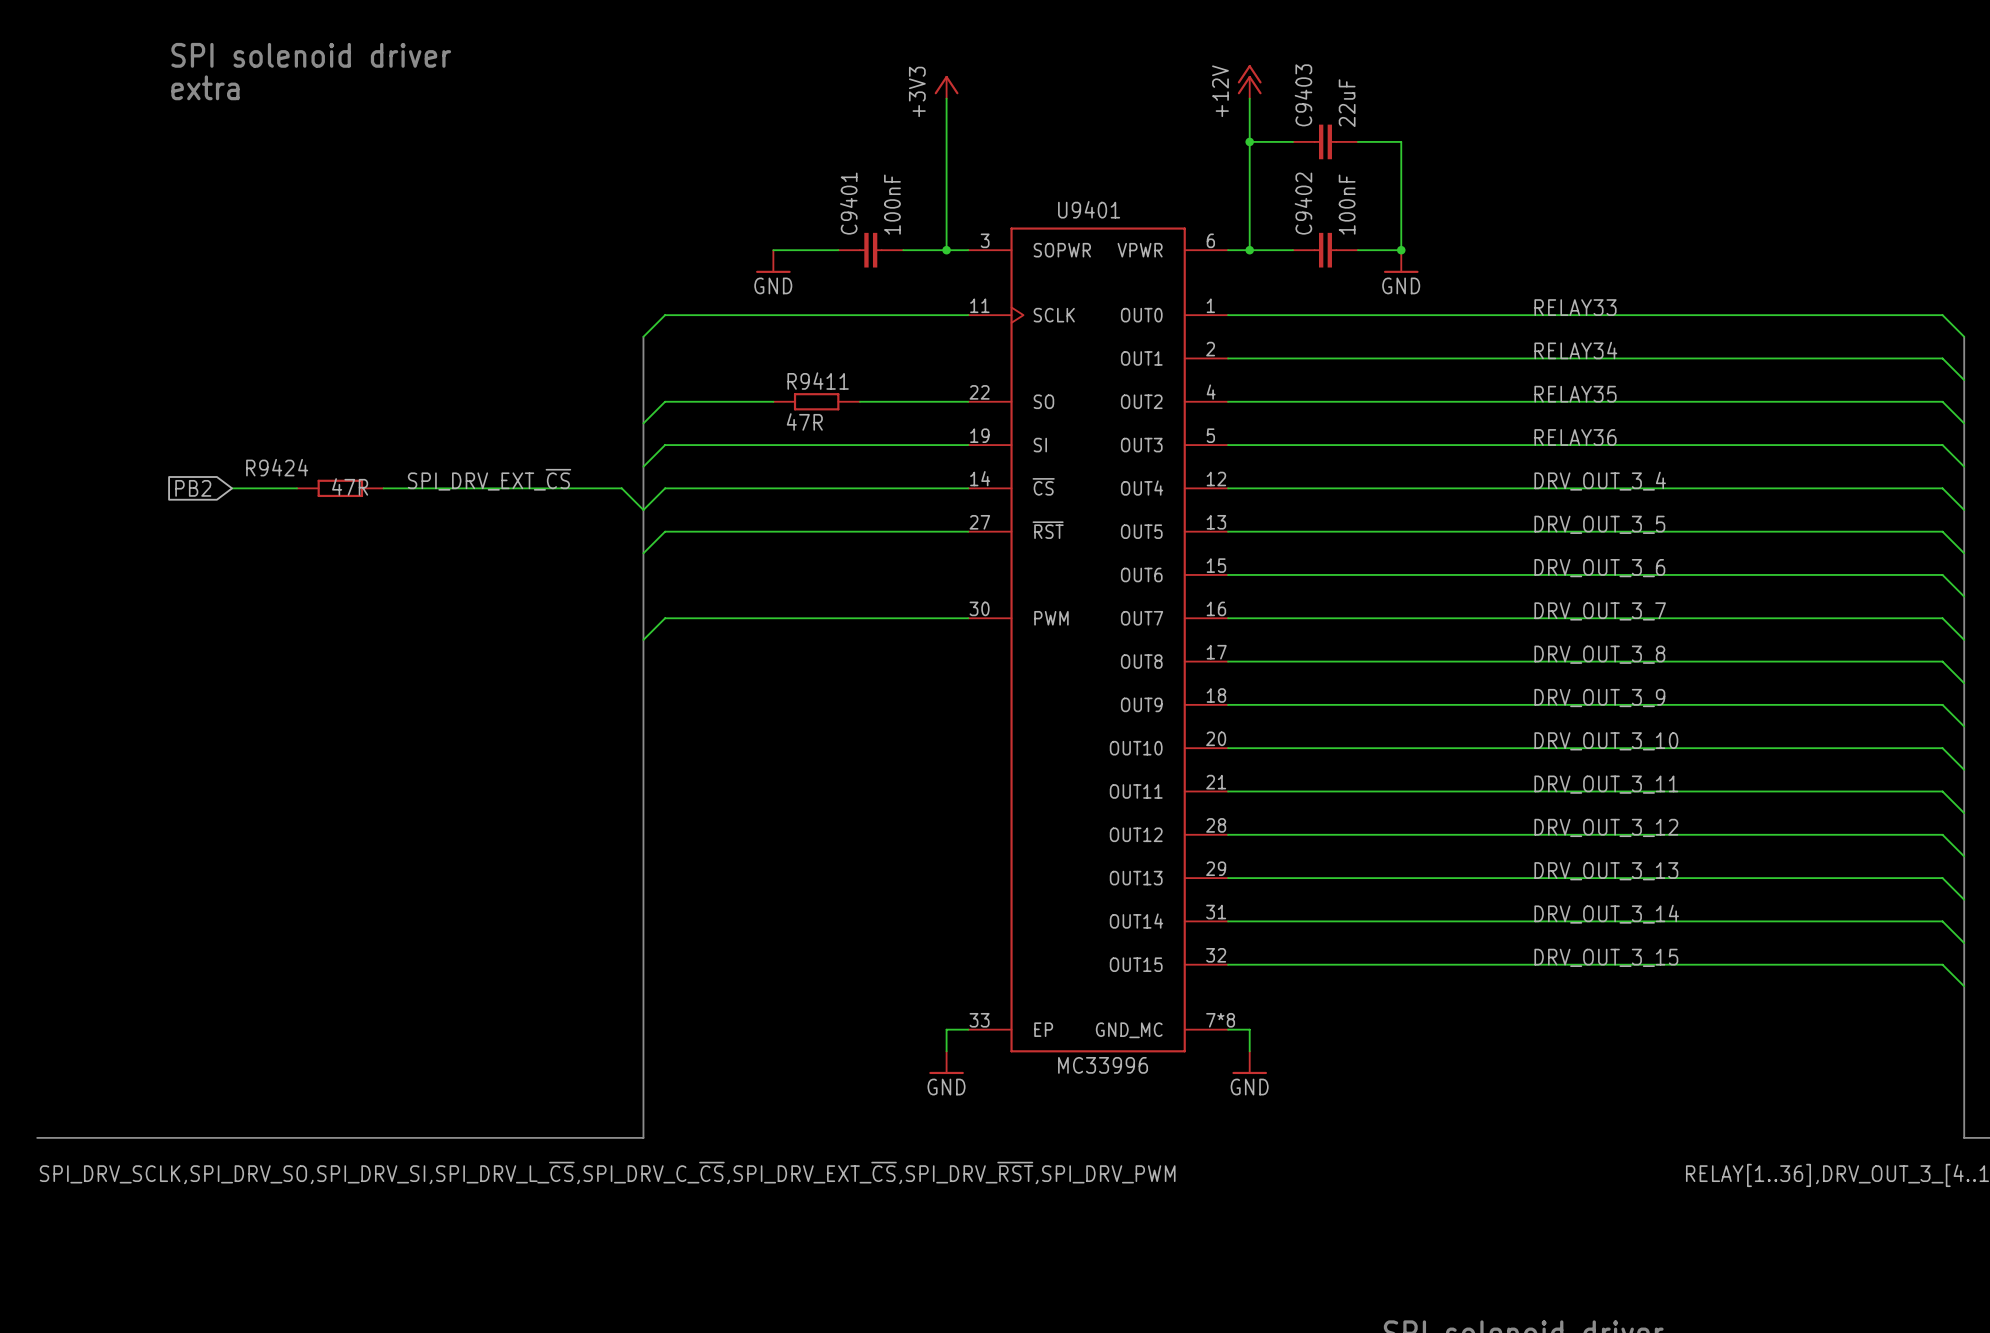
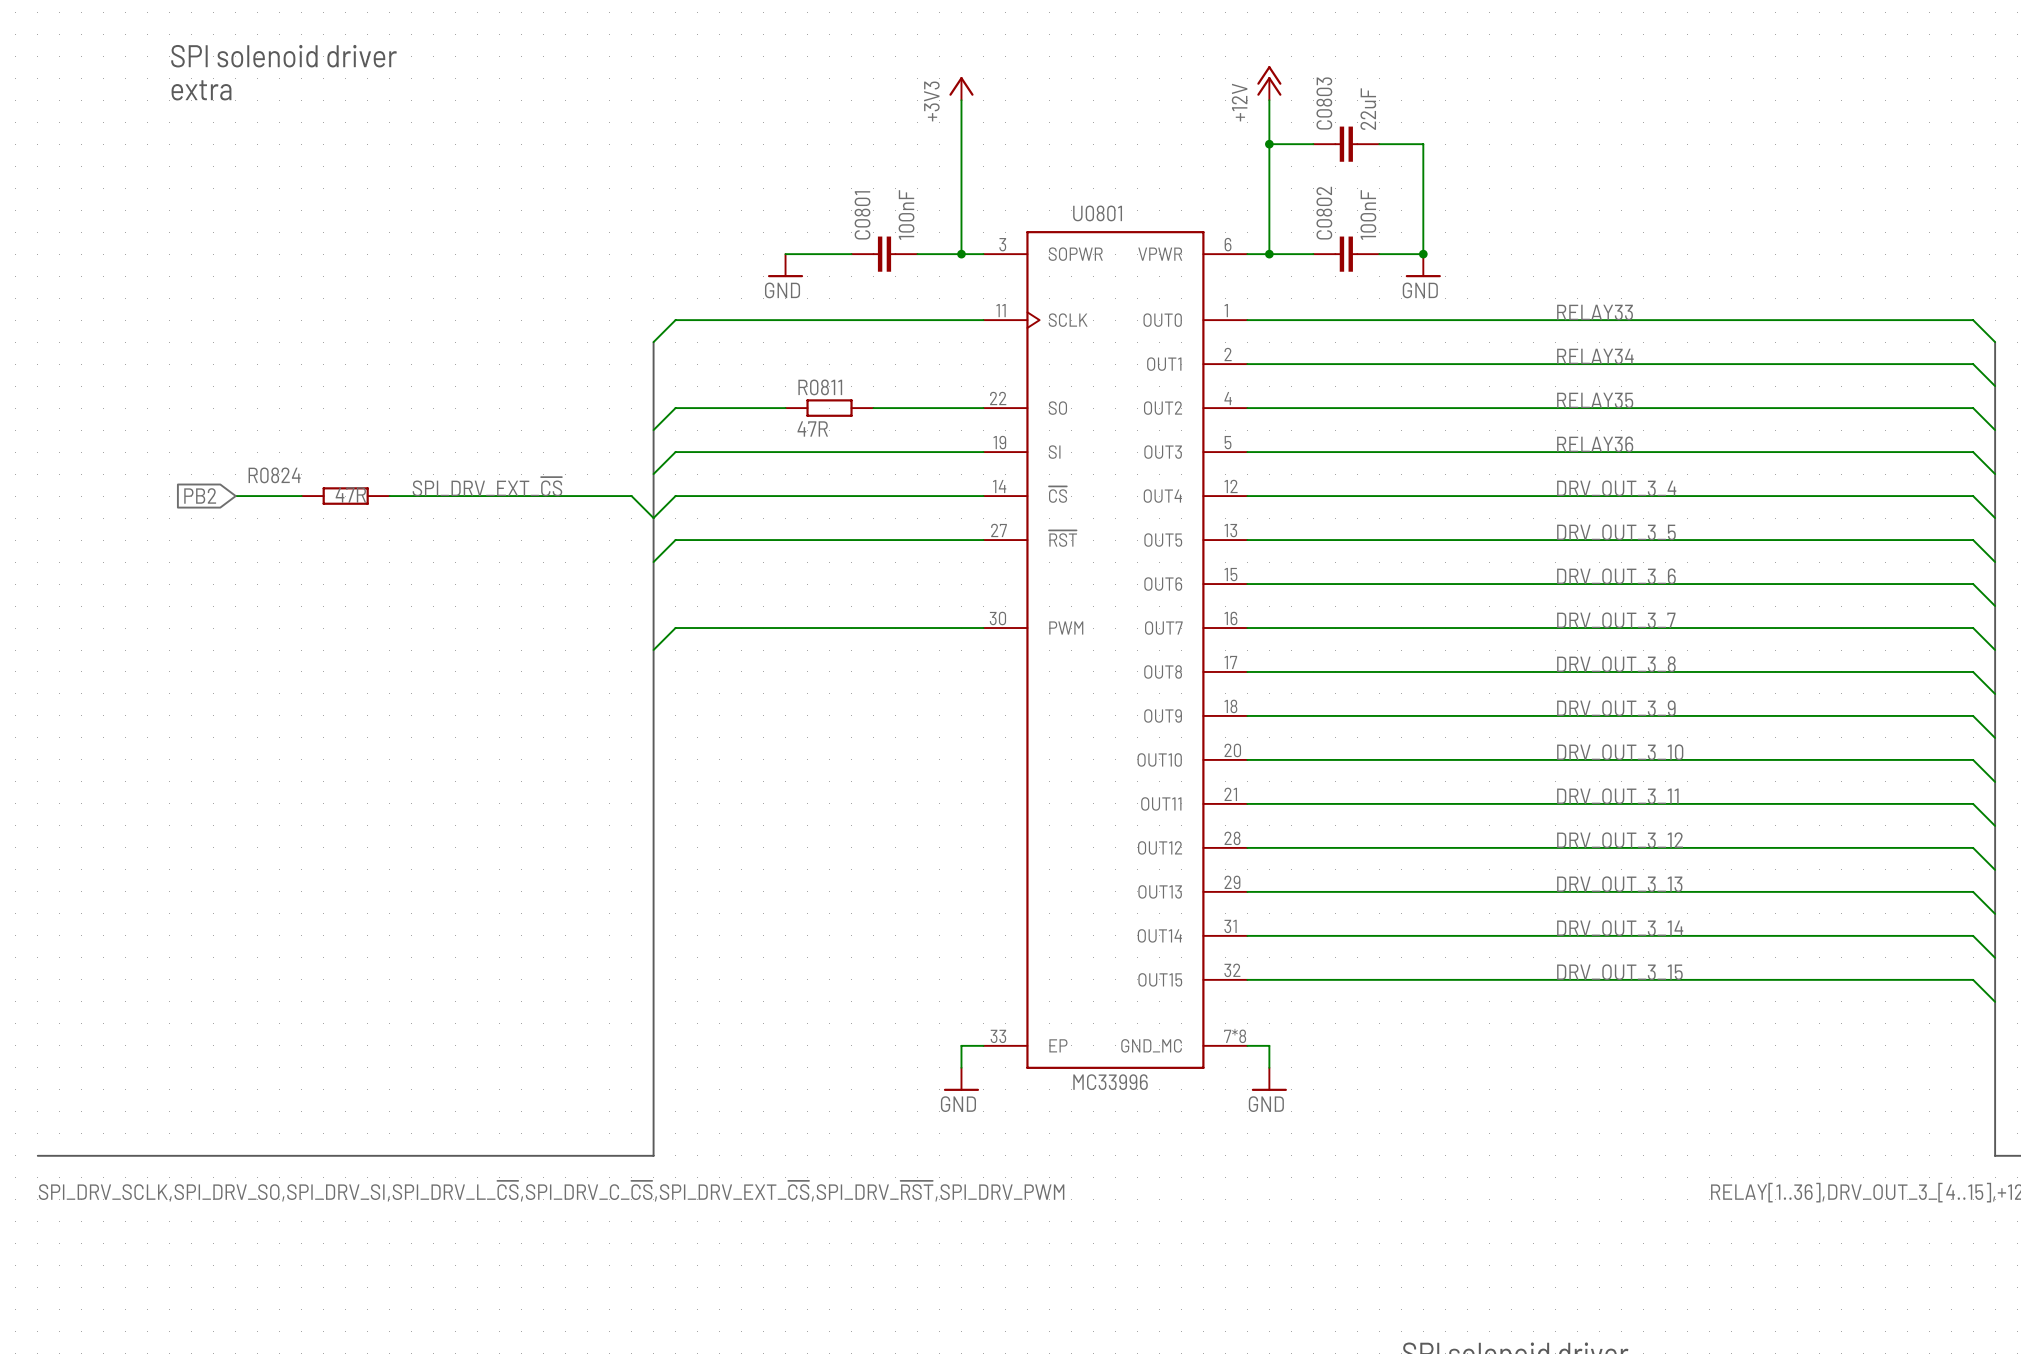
C9403 name: C9403 (1303, 95) -> C0803 (1324, 103)
C9401 name: C9401 (848, 203) -> C0801 (862, 215)
C9402 name: C9402 (1303, 203) -> C0802 (1324, 213)
U9401 name: U9401 (1089, 209) -> U0801 (1097, 213)
R9411 name: R9411 (818, 381) -> R0811 (820, 387)
R9424 name: R9424 (277, 467) -> R0824 (274, 475)

